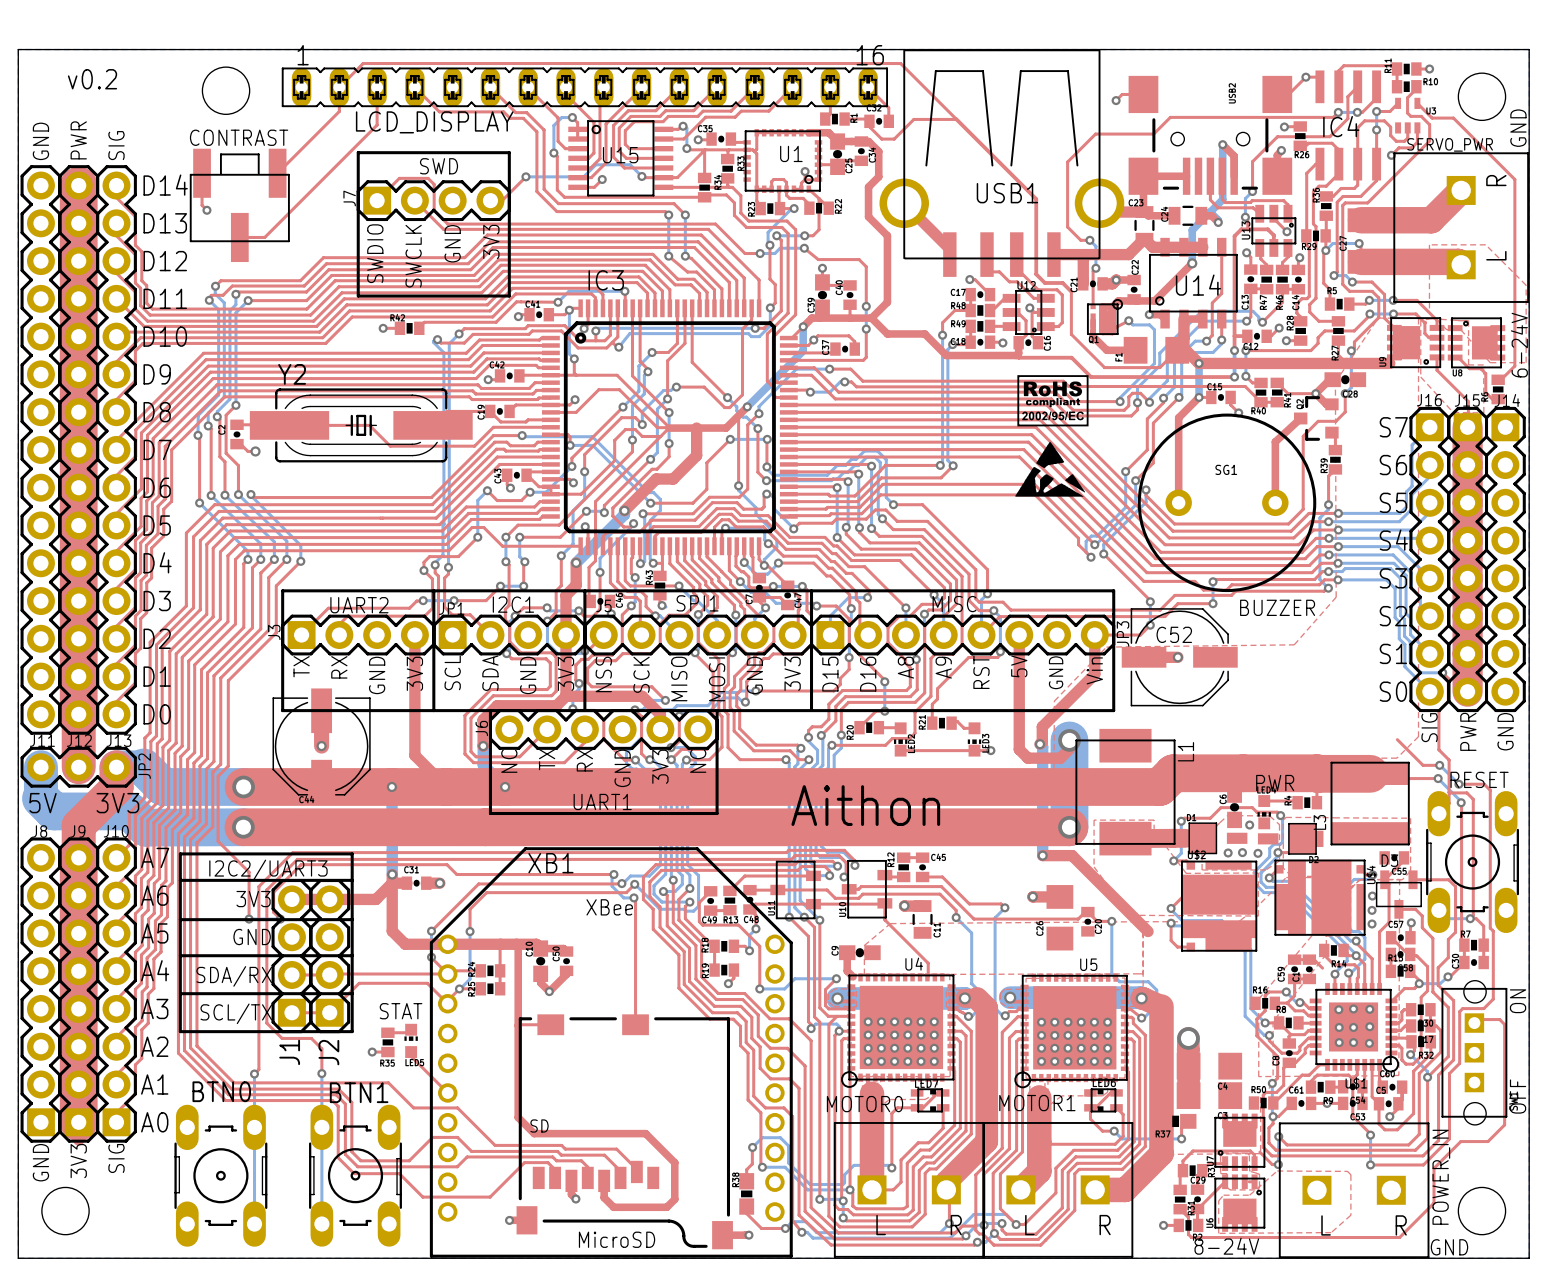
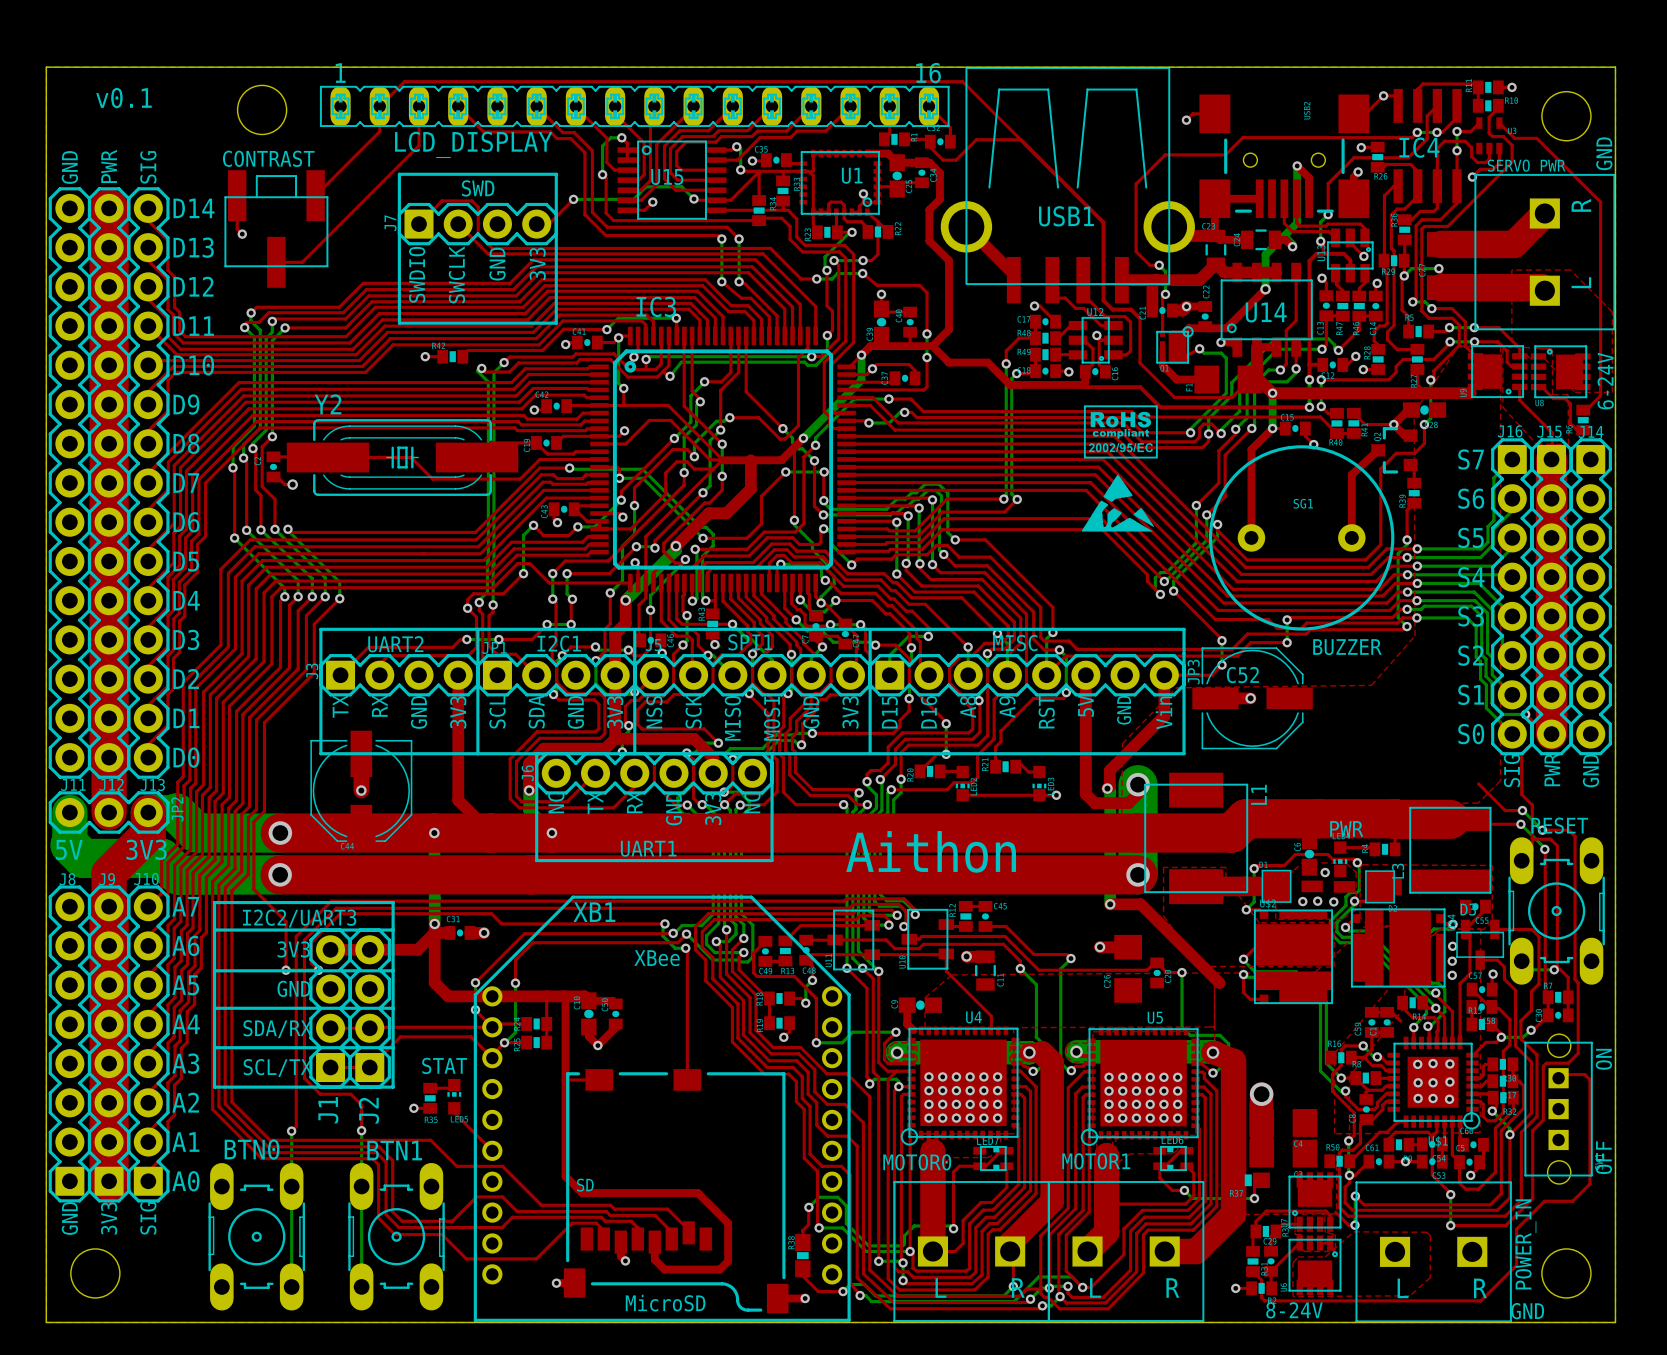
text: v0.2 (92, 79) -> v0.1 (123, 98)

